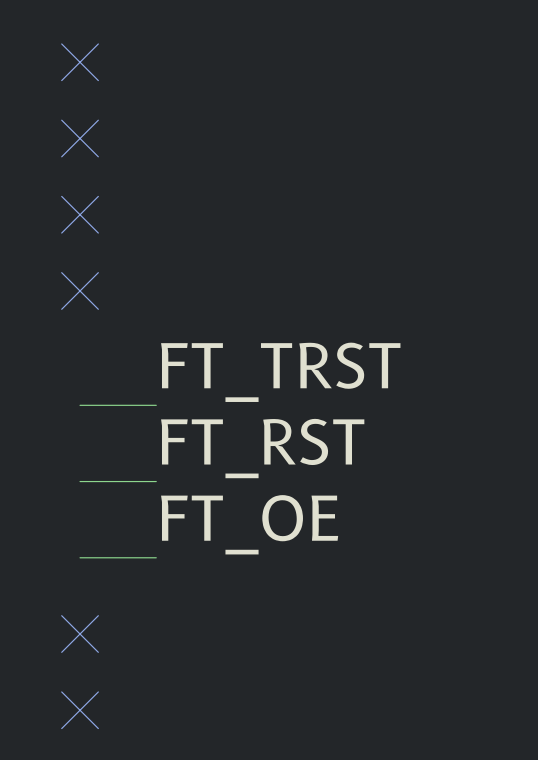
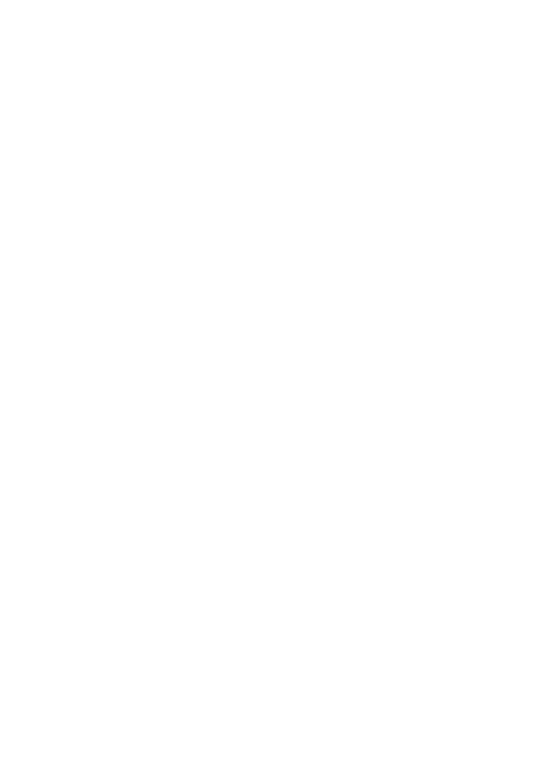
no-connect mark: (80, 62) -> none
no-connect mark: (80, 138) -> none
no-connect mark: (80, 214) -> none
no-connect mark: (80, 290) -> none
label: FT_TRST (280, 372) -> none
wire: (80, 405) (156, 405) -> none
label: FT_RST (262, 448) -> none
wire: (80, 481) (156, 481) -> none
label: FT_OE (249, 524) -> none
wire: (80, 557) (156, 557) -> none
no-connect mark: (80, 634) -> none
no-connect mark: (80, 710) -> none

